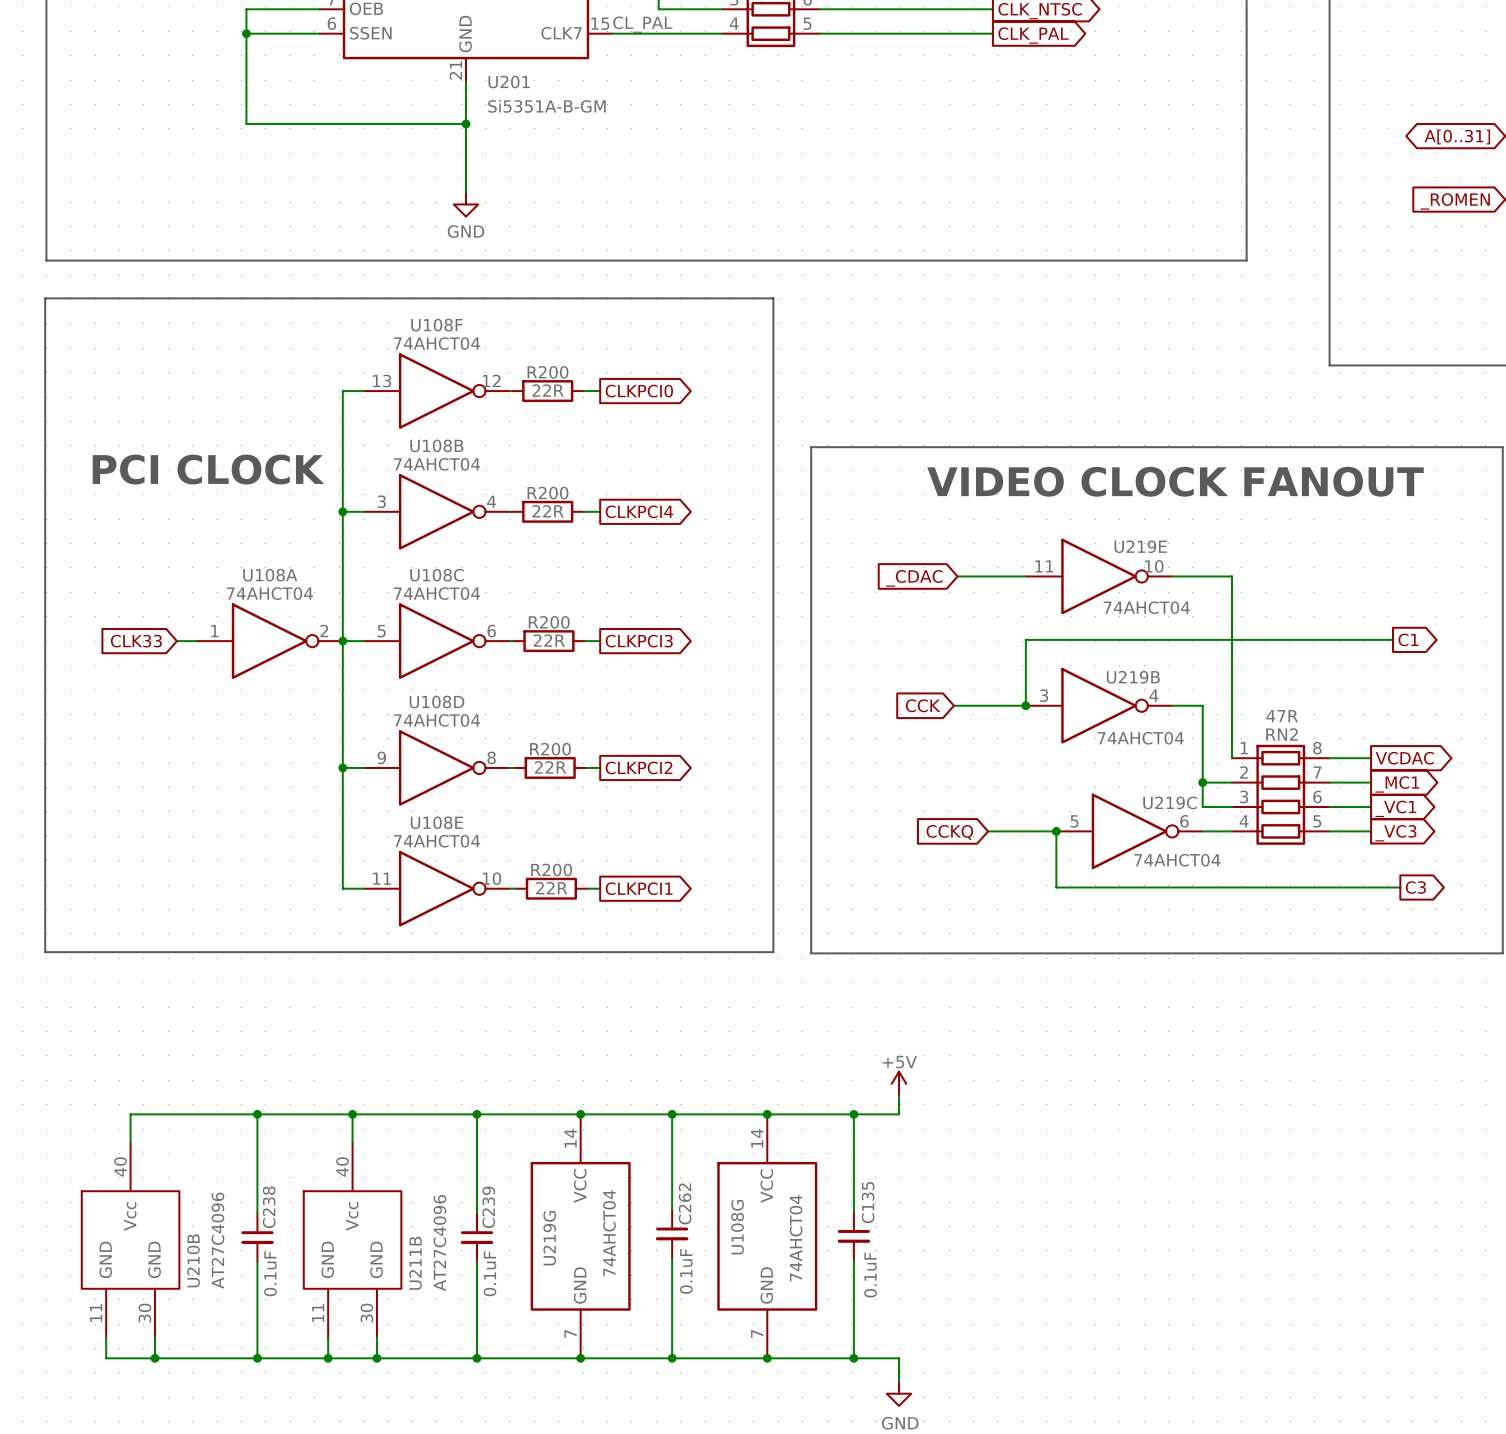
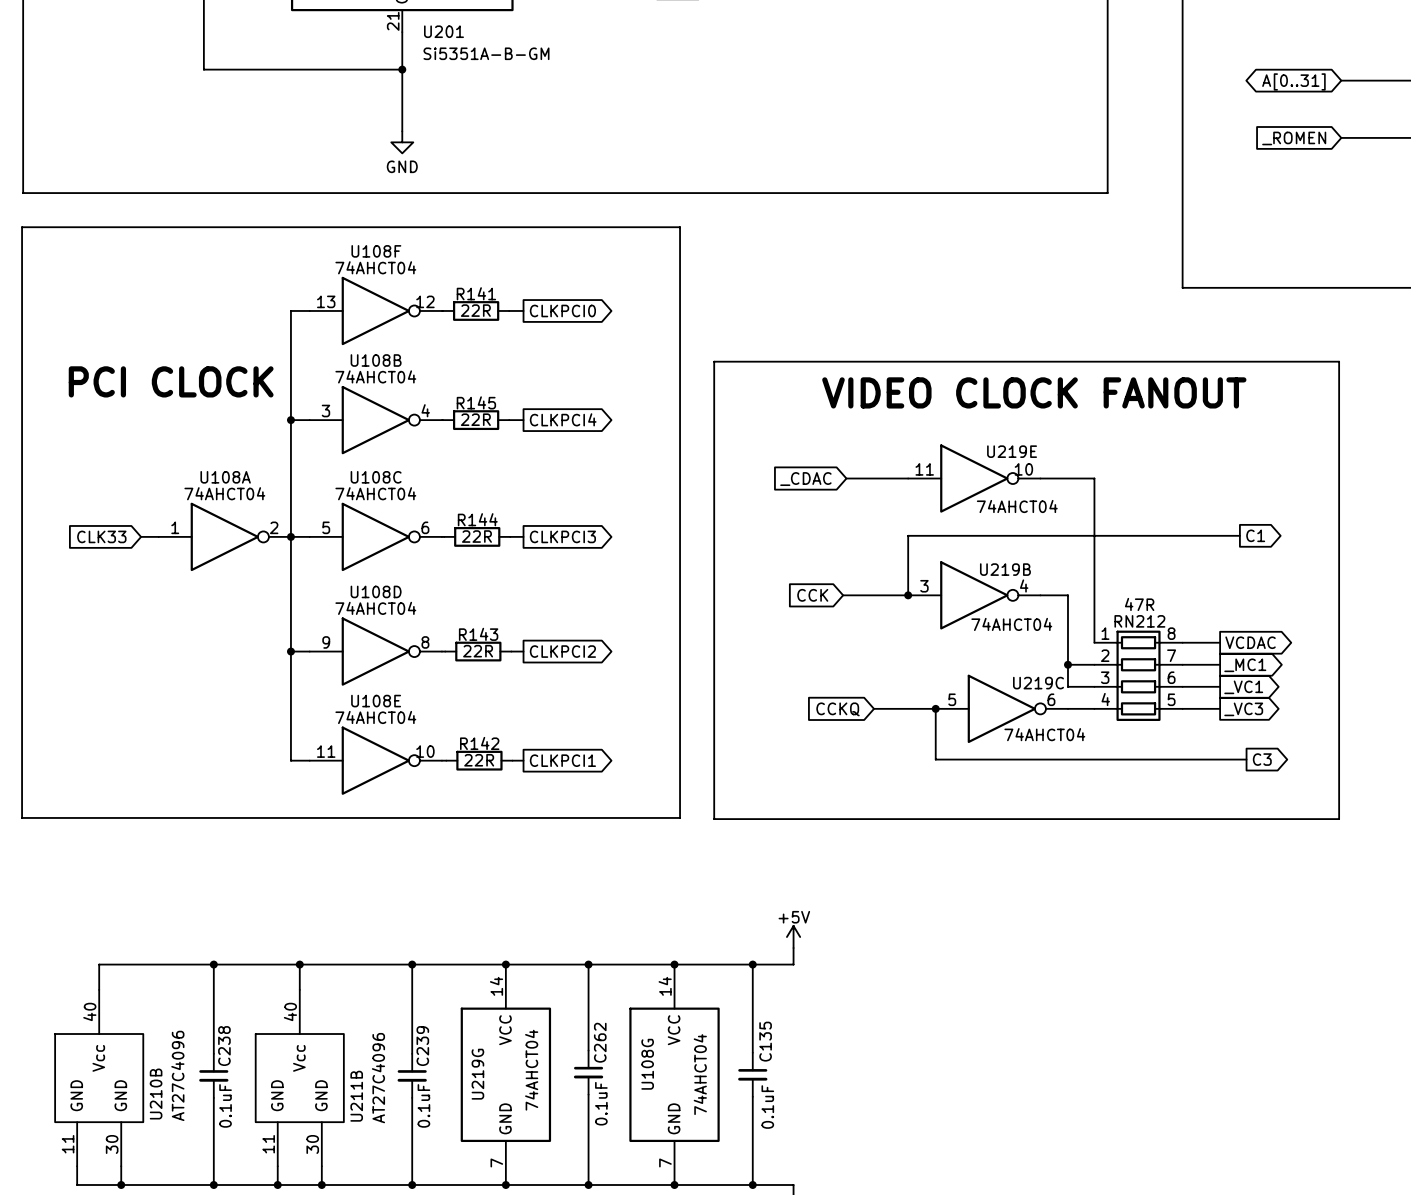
R200 name: R200 (547, 372) -> R141 (476, 293)
R200 name: R200 (547, 493) -> R145 (476, 402)
R200 name: R200 (549, 622) -> R144 (477, 519)
RN2 name: RN2 (1281, 734) -> RN212 (1139, 621)
R200 name: R200 (550, 749) -> R143 (478, 634)
R200 name: R200 (551, 869) -> R142 (479, 743)

